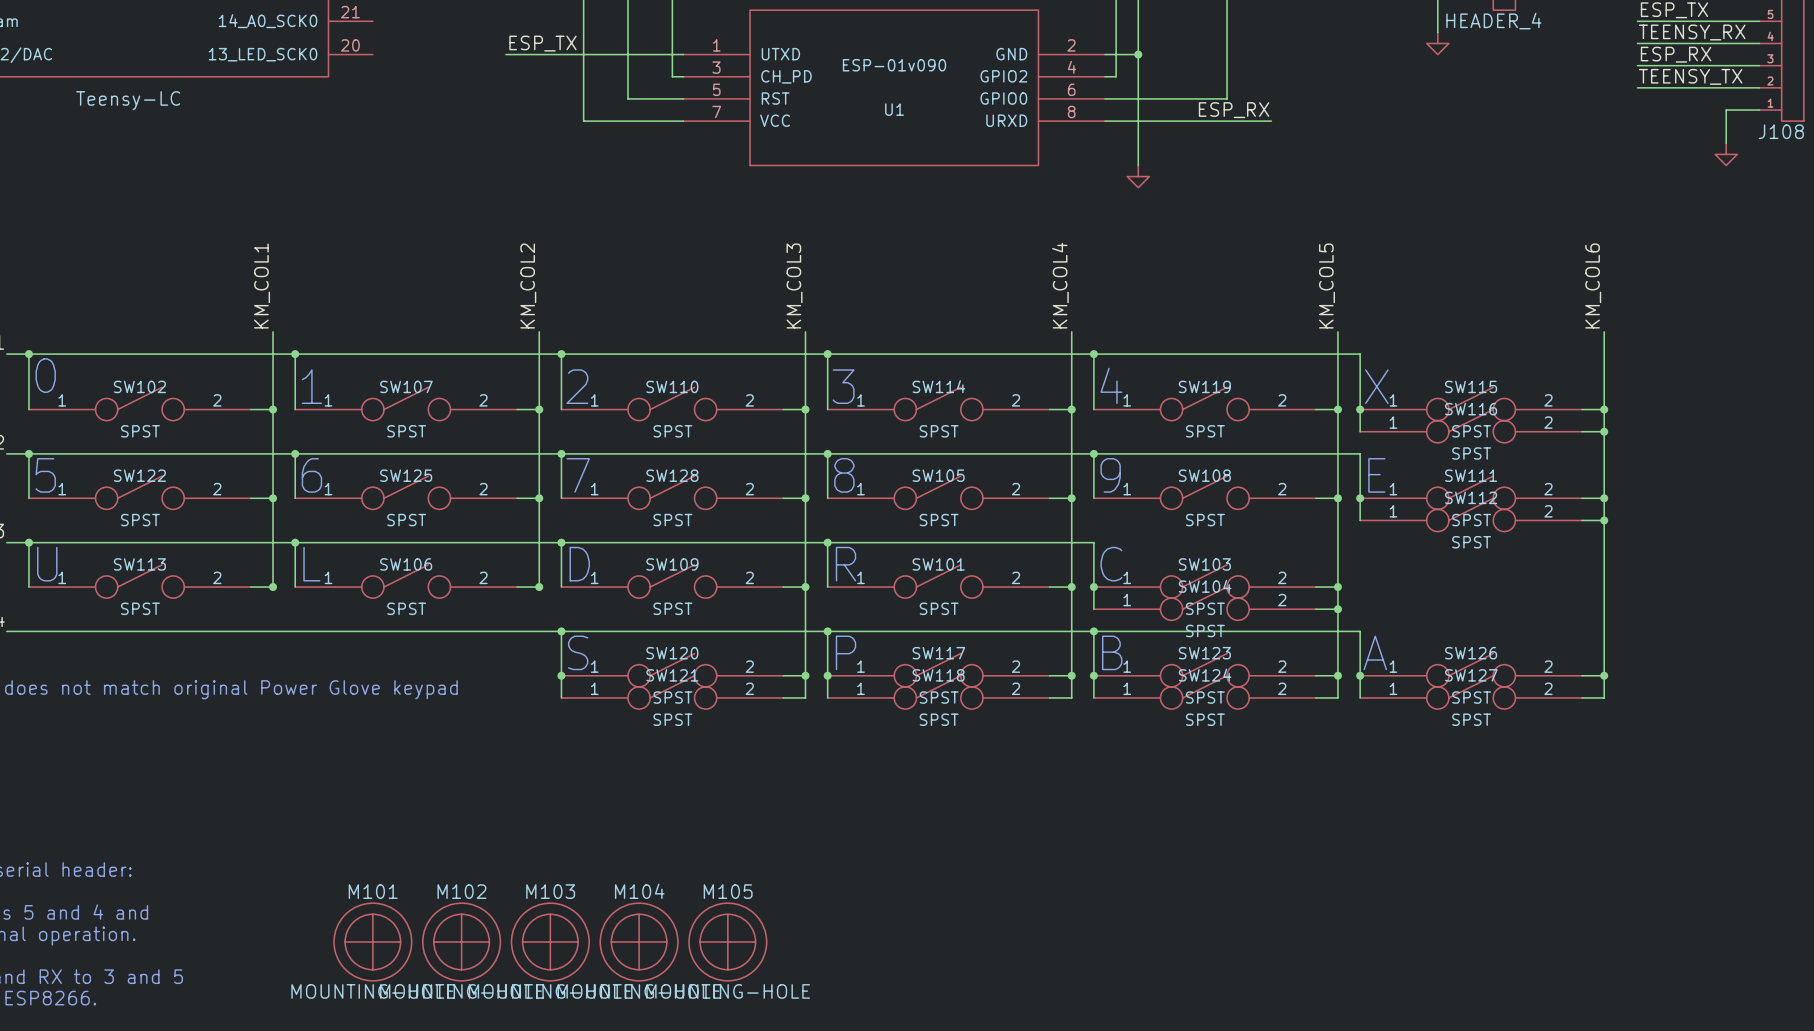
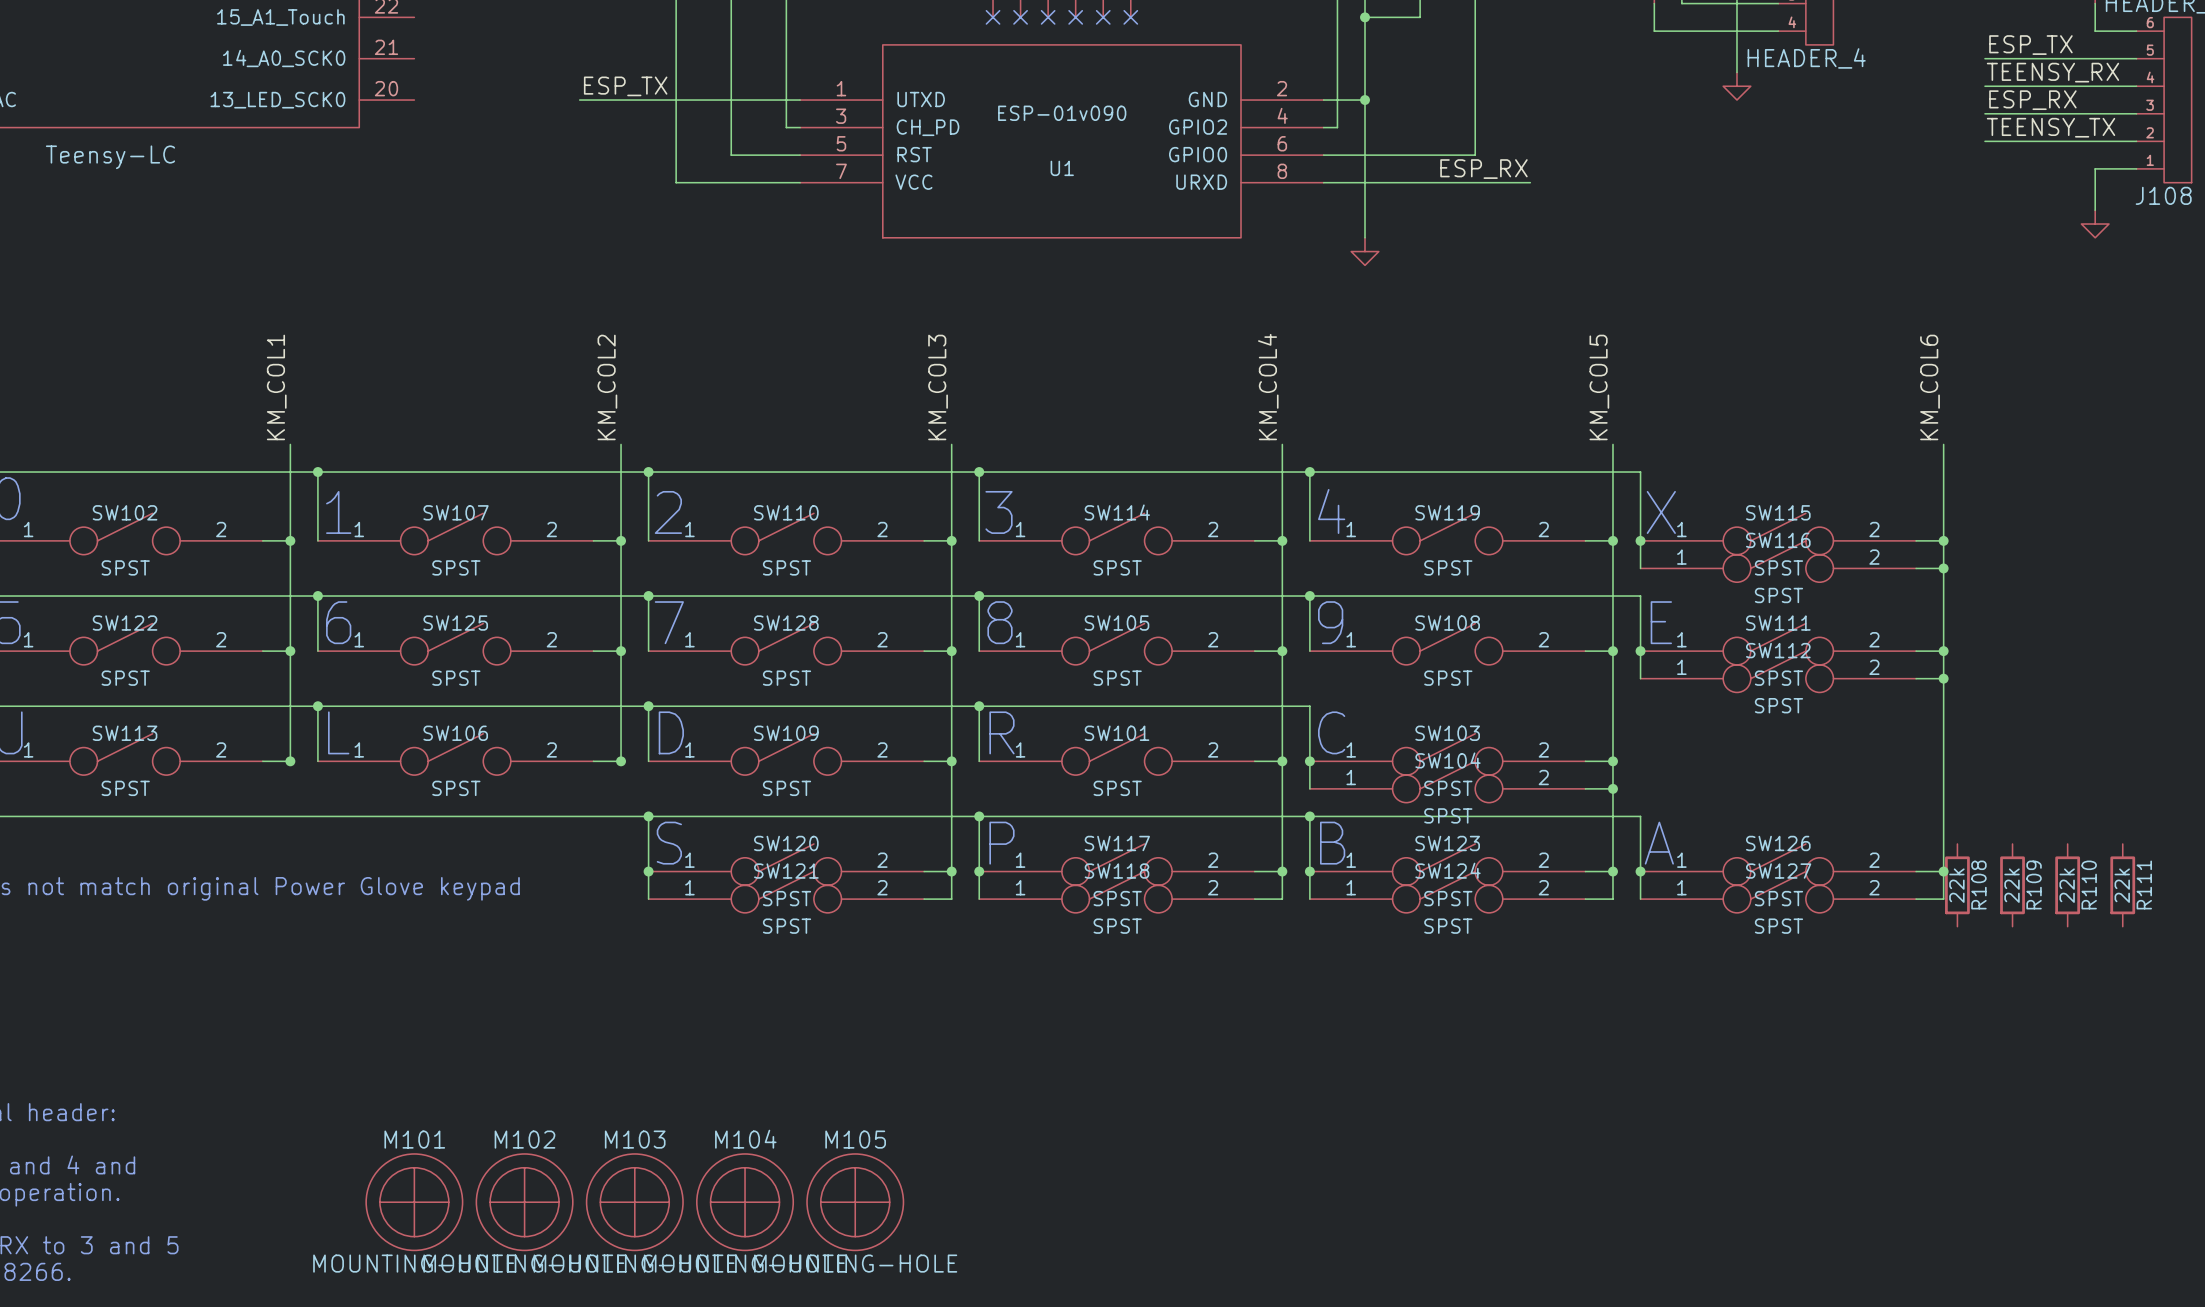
R108: none -> 22k (1957, 885)
R109: none -> 22k (2012, 885)
R110: none -> 22k (2067, 885)
R111: none -> 22k (2122, 885)

